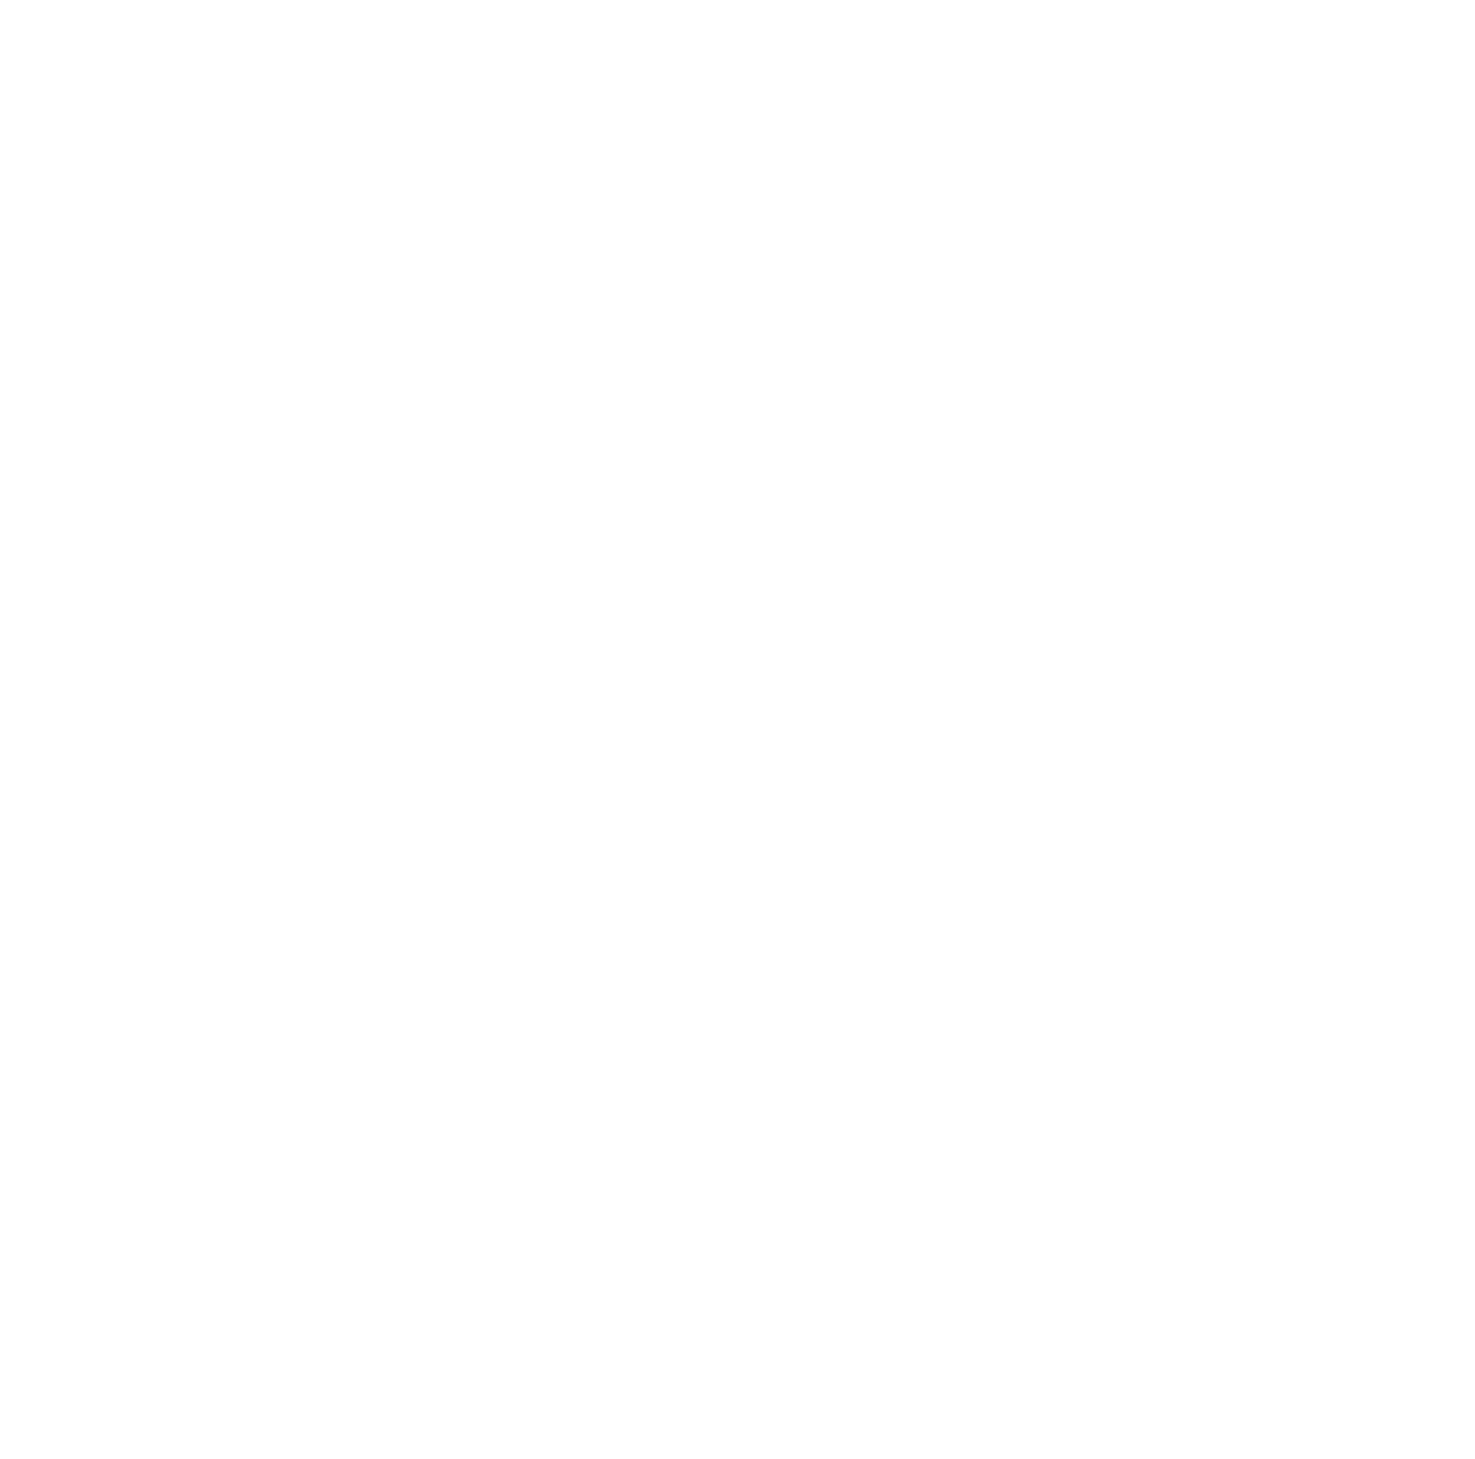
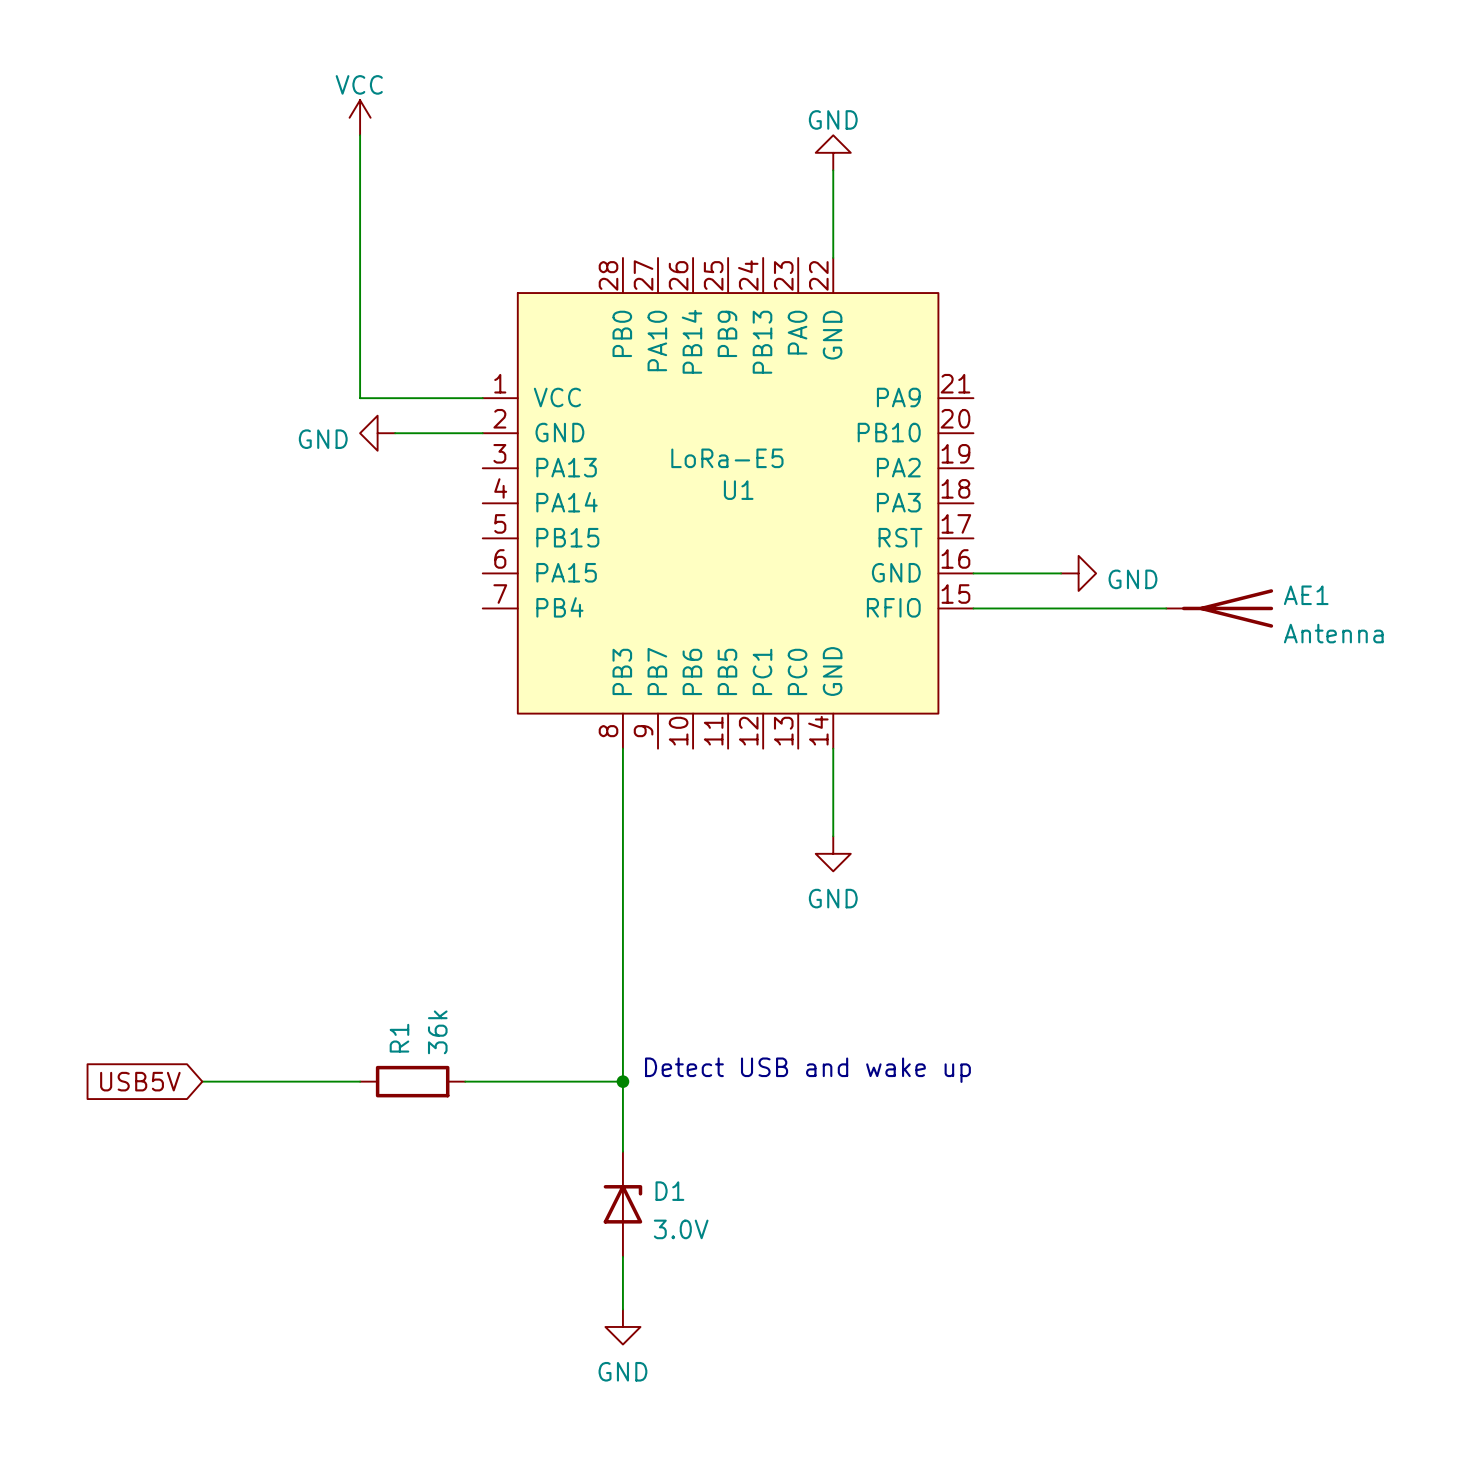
power symbol: none -> VCC (360, 117)
wire: none -> (360, 135) (360, 398) (482, 398)
power symbol: none -> GND (833, 152)
wire: none -> (833, 170) (833, 257)
power symbol: none -> GND (377, 433)
wire: none -> (395, 433) (482, 433)
U1: none -> LoRa-E5 (728, 503)
wire: none -> (973, 573) (1061, 573)
power symbol: none -> GND (1078, 573)
wire: none -> (973, 608) (1166, 608)
AE1: none -> Antenna (1219, 608)
wire: none -> (622, 748) (622, 1151)
wire: none -> (833, 748) (833, 836)
power symbol: none -> GND (833, 853)
text: none -> Detect USB and wake up (807, 1070)
global label: none -> USB5V (140, 1081)
wire: none -> (202, 1081) (360, 1081)
R1: none -> 36k (412, 1081)
wire: none -> (465, 1081) (622, 1081)
junction: none -> (622, 1081)
D1: none -> 3.0V (622, 1204)
wire: none -> (622, 1256) (622, 1309)
power symbol: none -> GND (622, 1326)

